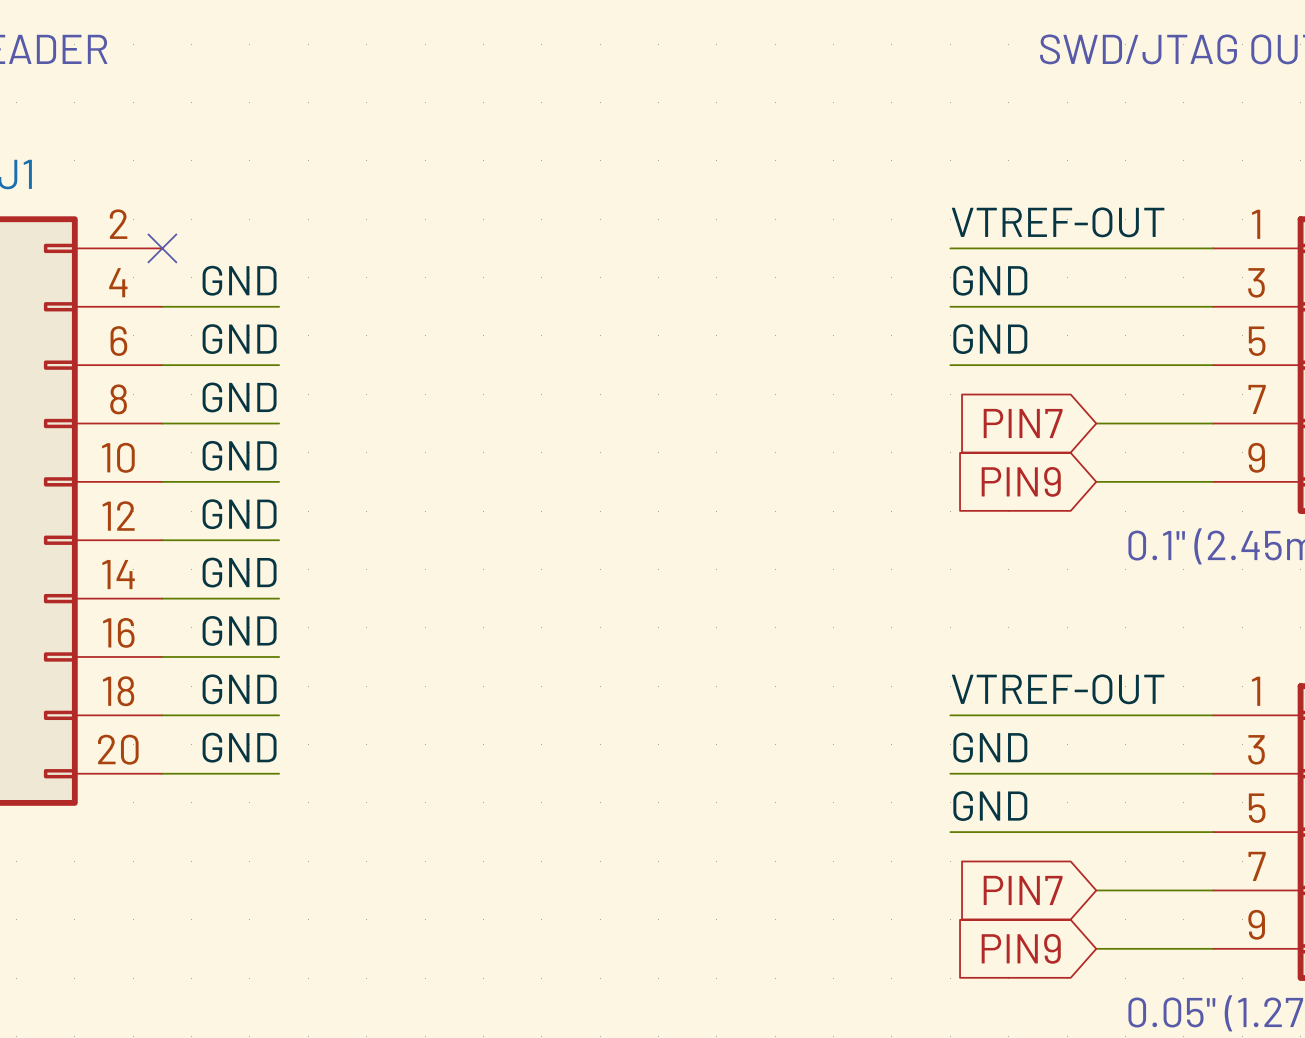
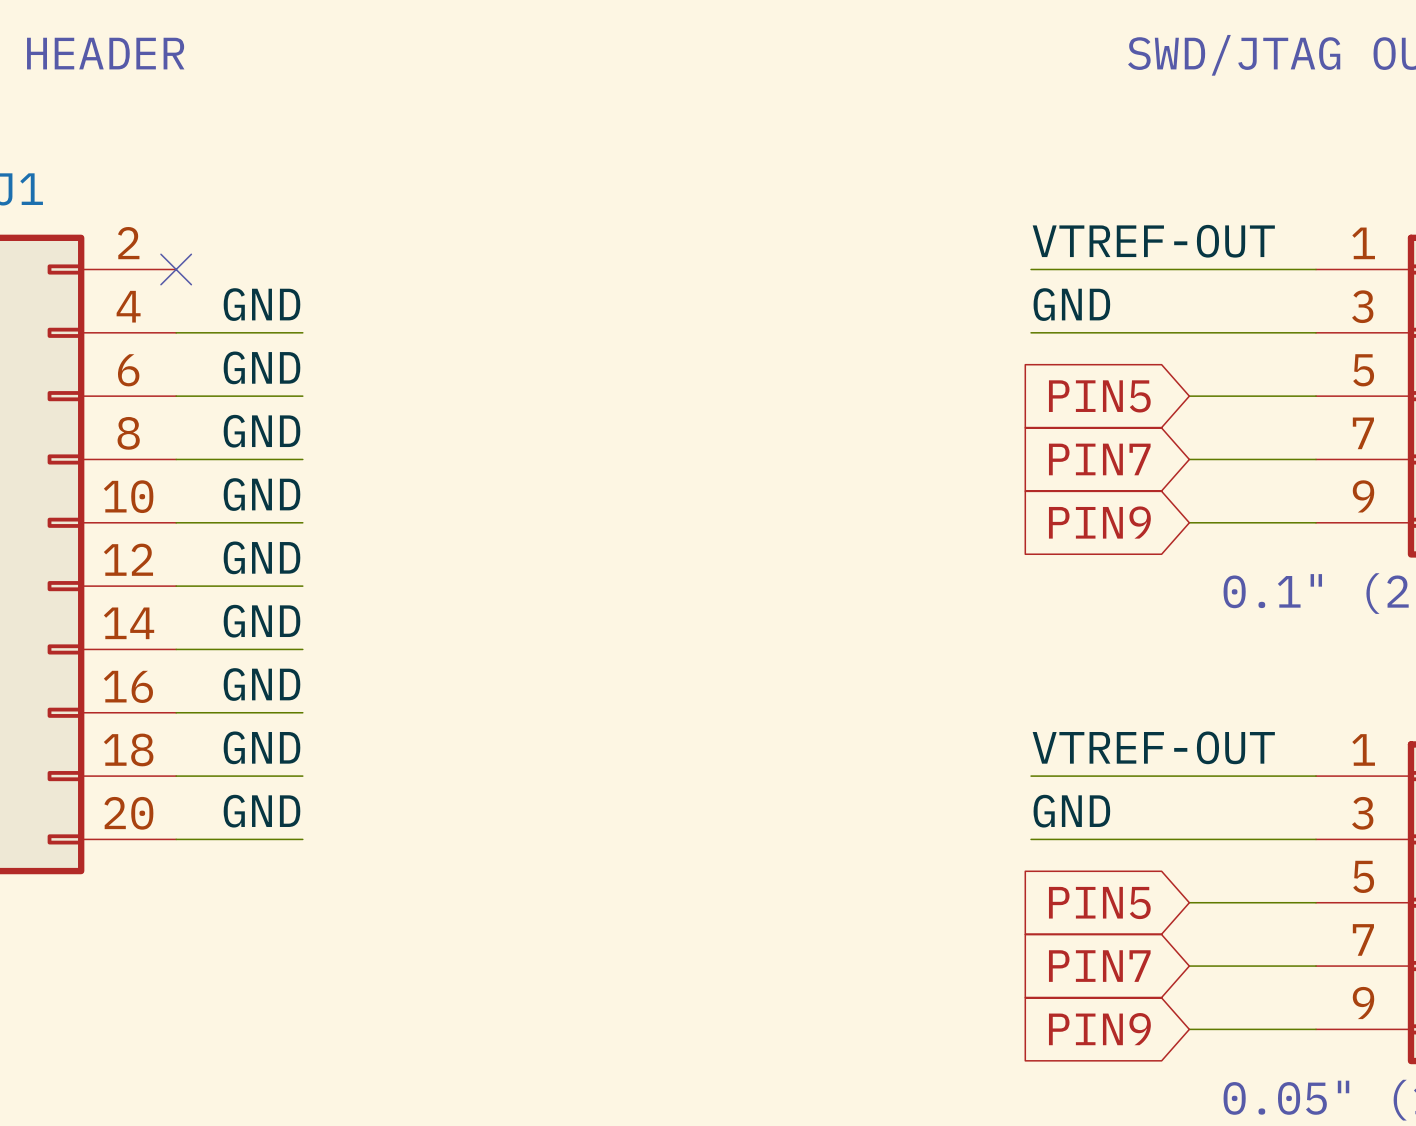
label: GND (990, 339) -> none
wire: (950, 365) (1096, 365) -> none
global label: none -> PIN5 (1099, 396)
label: GND (990, 806) -> none
wire: (950, 832) (1096, 832) -> none
global label: none -> PIN5 (1099, 903)

